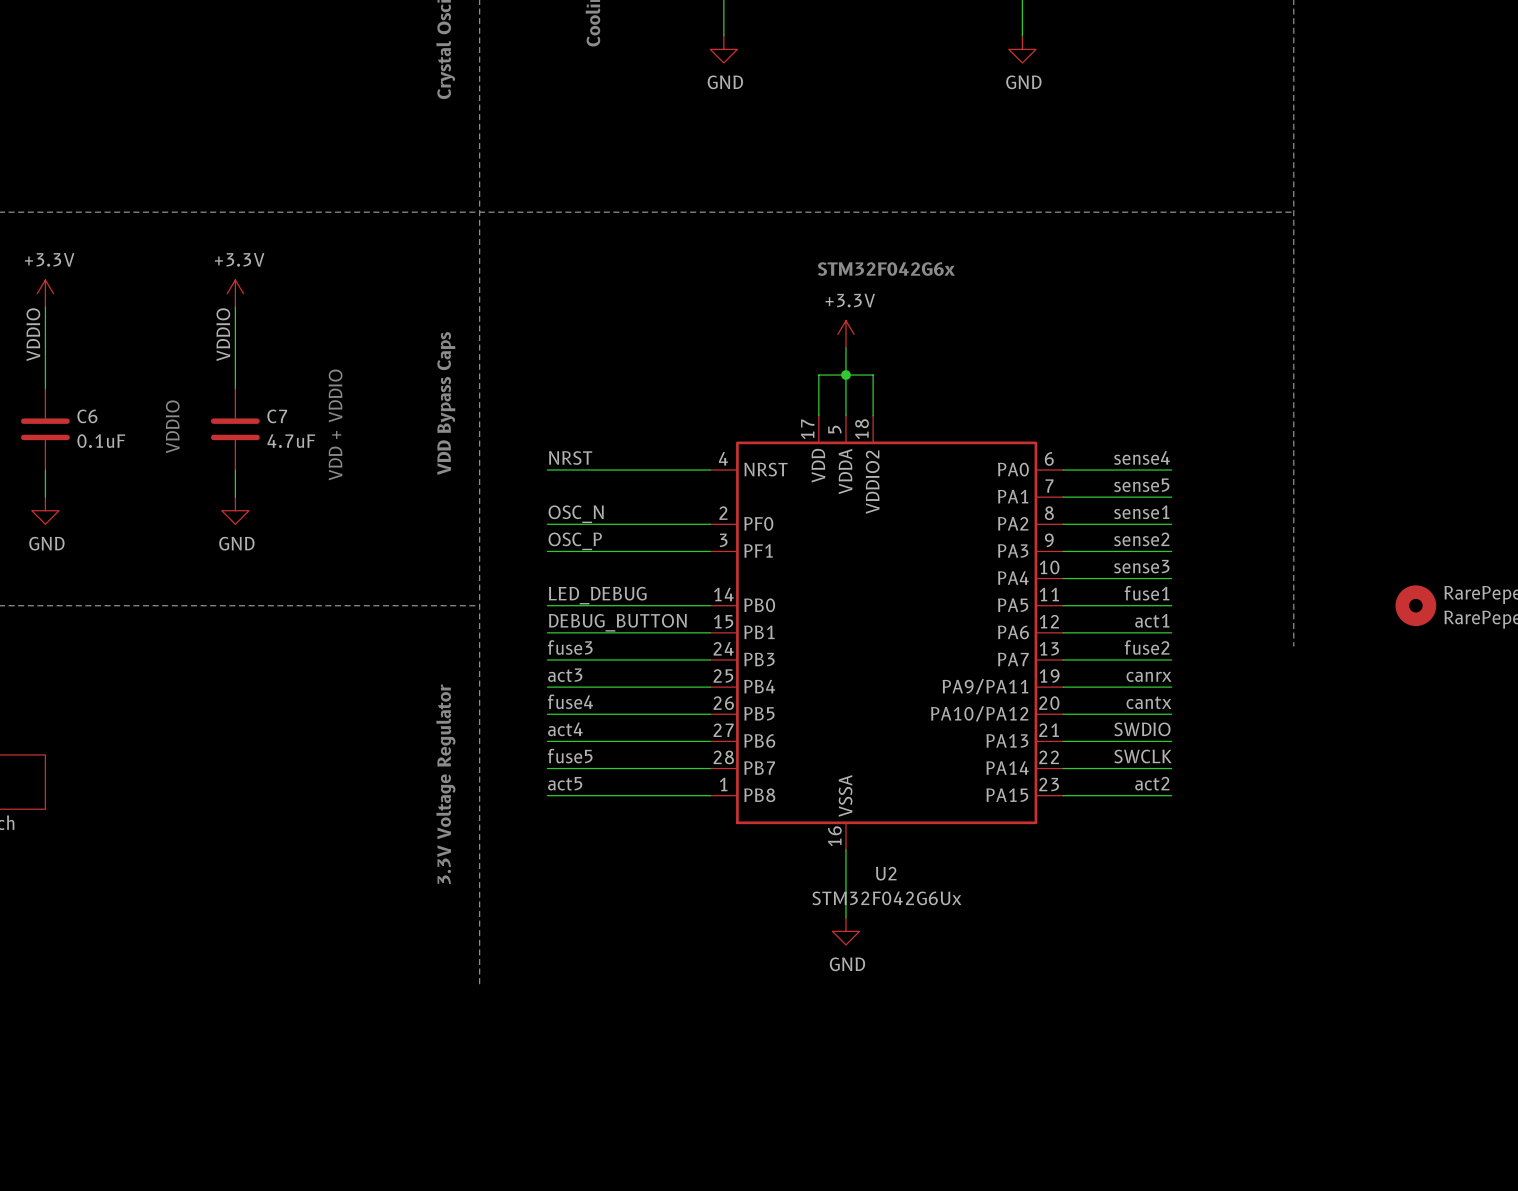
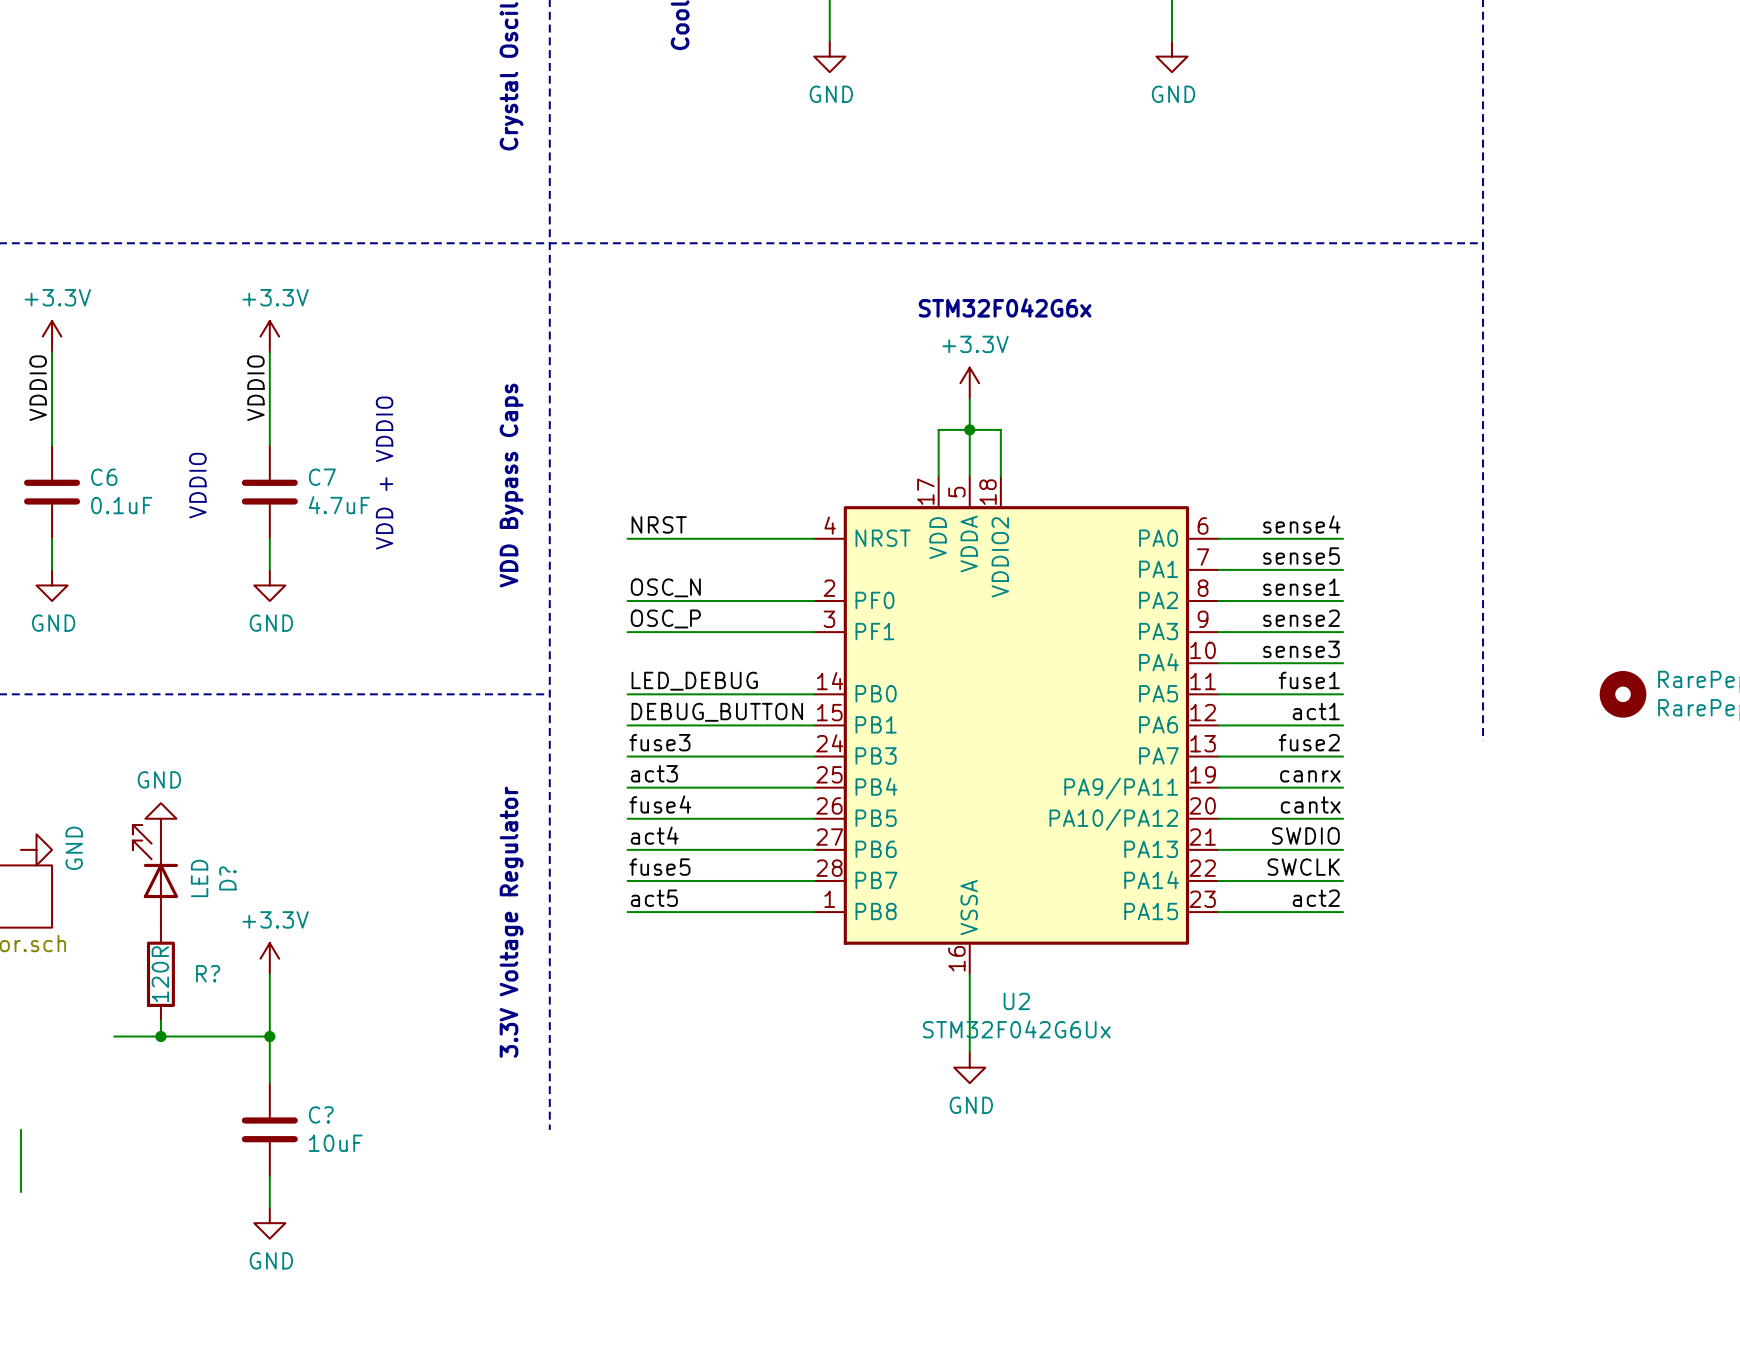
power symbol: none -> GND (160, 818)
power symbol: none -> GND (36, 849)
D?: none -> LED (155, 876)
power symbol: none -> +3.3V (269, 958)
R?: none -> 120R (160, 974)
wire: none -> (269, 974) (269, 1083)
wire: none -> (160, 1020) (160, 1036)
wire: none -> (114, 1036) (269, 1036)
junction: none -> (160, 1036)
junction: none -> (269, 1036)
wire: none -> (20, 1129) (20, 1192)
C?: none -> 10uF (269, 1129)
wire: none -> (269, 1176) (269, 1207)
power symbol: none -> GND (269, 1223)

